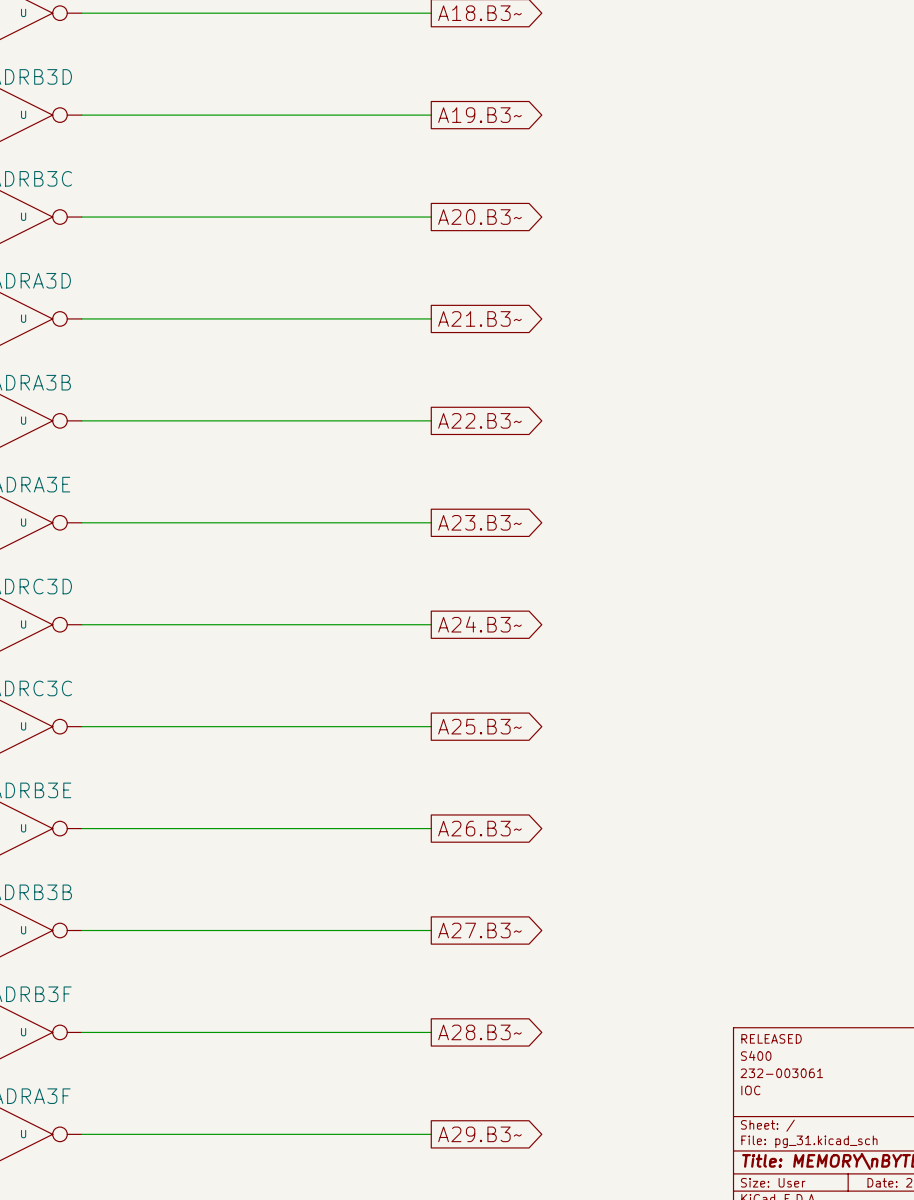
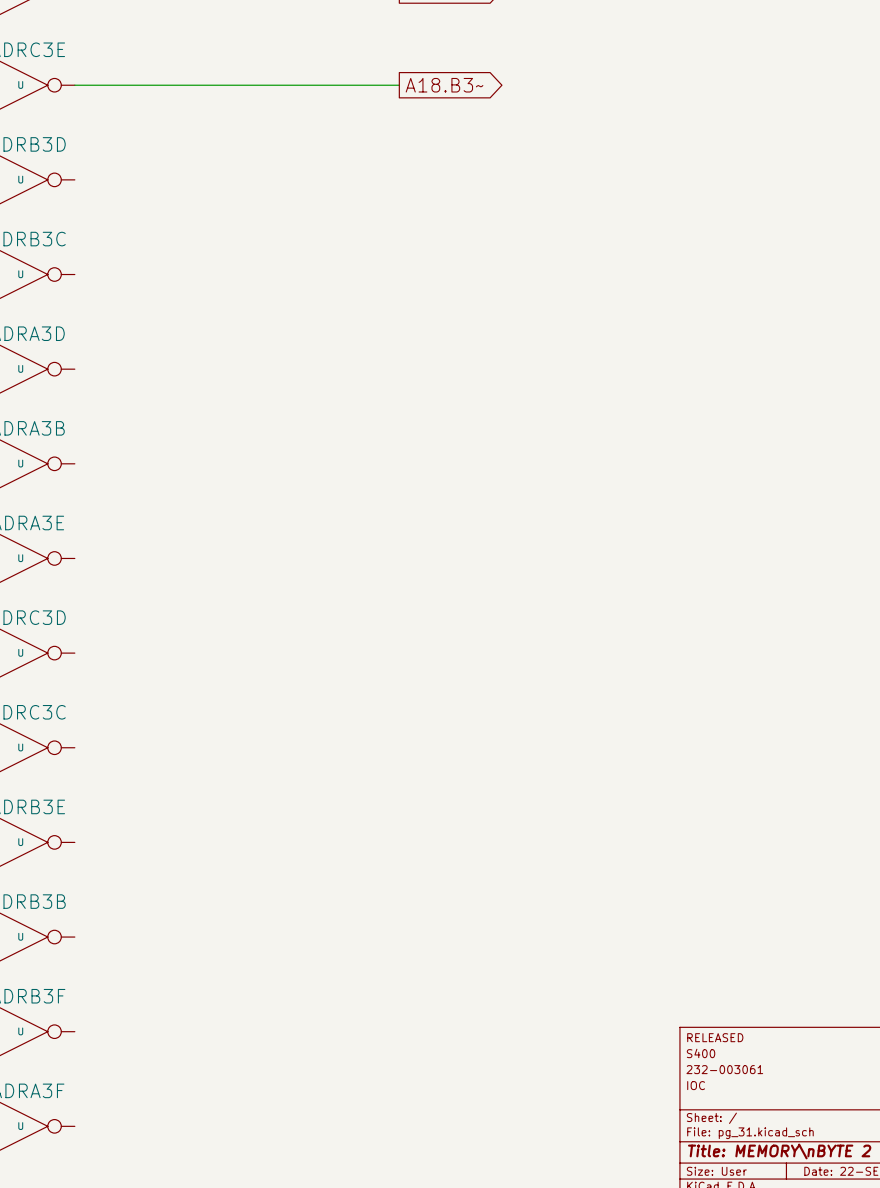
wire: (81, 115) (431, 115) -> none
global label: A19.B3~ (479, 115) -> none
wire: (81, 217) (431, 217) -> none
global label: A20.B3~ (479, 217) -> none
wire: (81, 318) (431, 318) -> none
global label: A21.B3~ (479, 318) -> none
wire: (81, 420) (431, 420) -> none
global label: A22.B3~ (479, 420) -> none
wire: (81, 522) (431, 522) -> none
global label: A23.B3~ (479, 522) -> none
wire: (81, 624) (431, 624) -> none
global label: A24.B3~ (479, 624) -> none
wire: (81, 726) (431, 726) -> none
global label: A25.B3~ (479, 726) -> none
wire: (81, 828) (431, 828) -> none
global label: A26.B3~ (479, 828) -> none
wire: (81, 930) (431, 930) -> none
global label: A27.B3~ (479, 930) -> none
wire: (81, 1032) (431, 1032) -> none
global label: A28.B3~ (479, 1032) -> none
wire: (81, 1134) (431, 1134) -> none
global label: A29.B3~ (479, 1134) -> none

